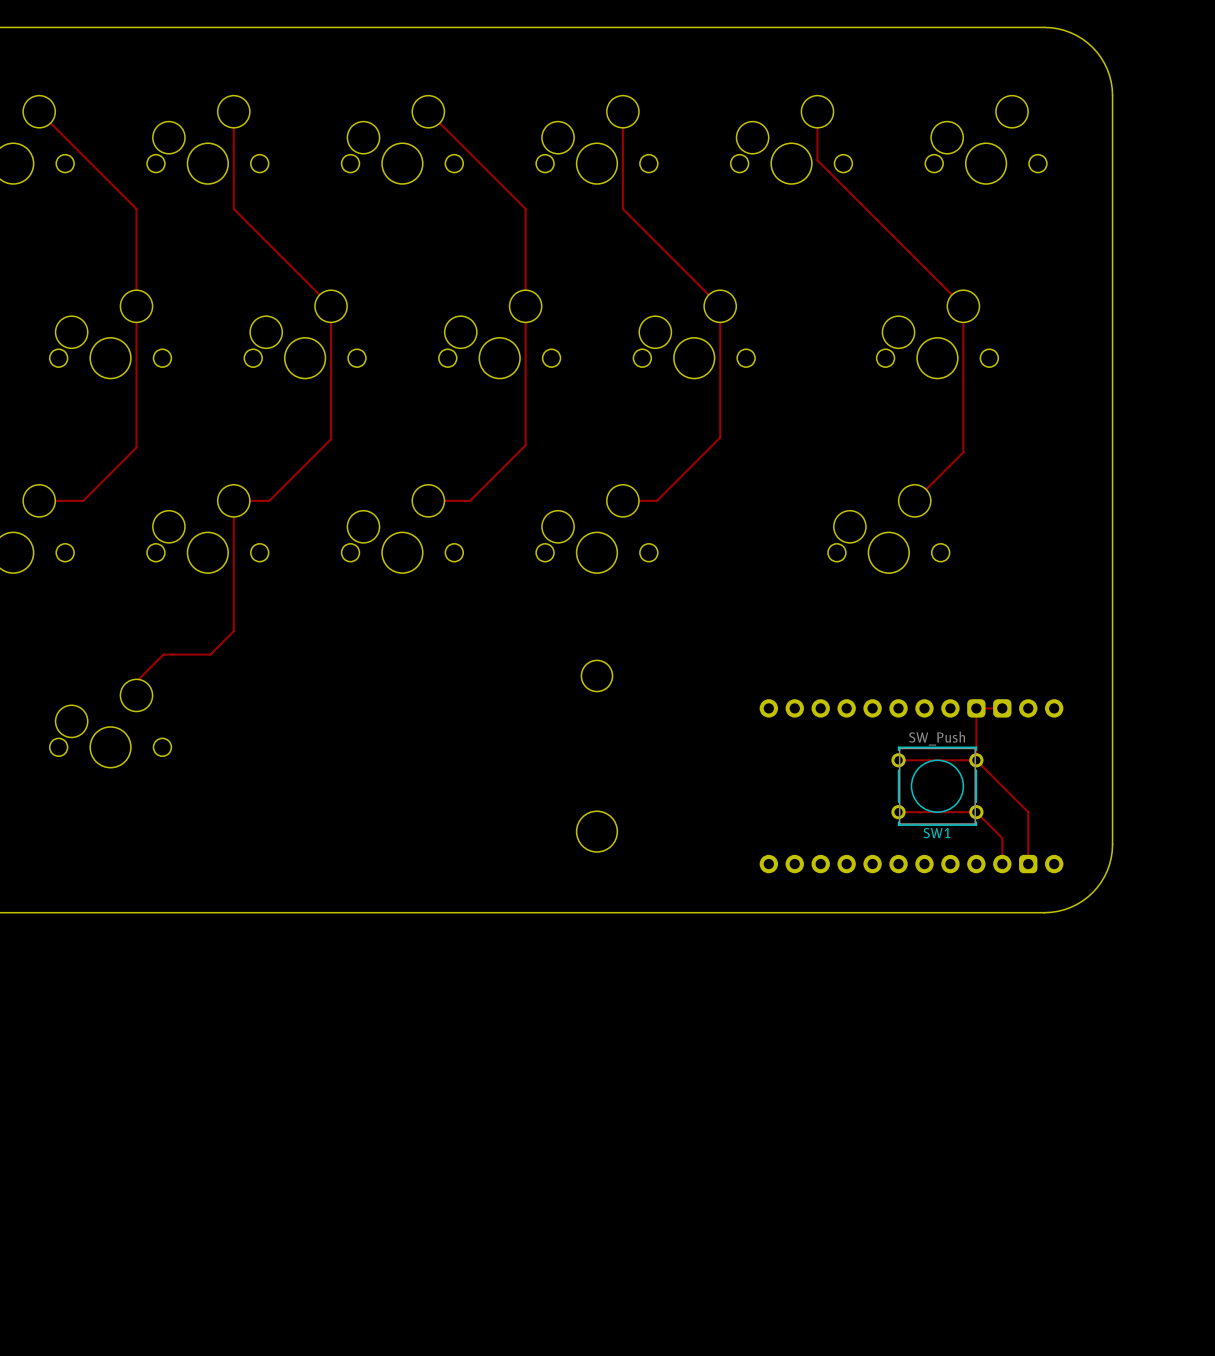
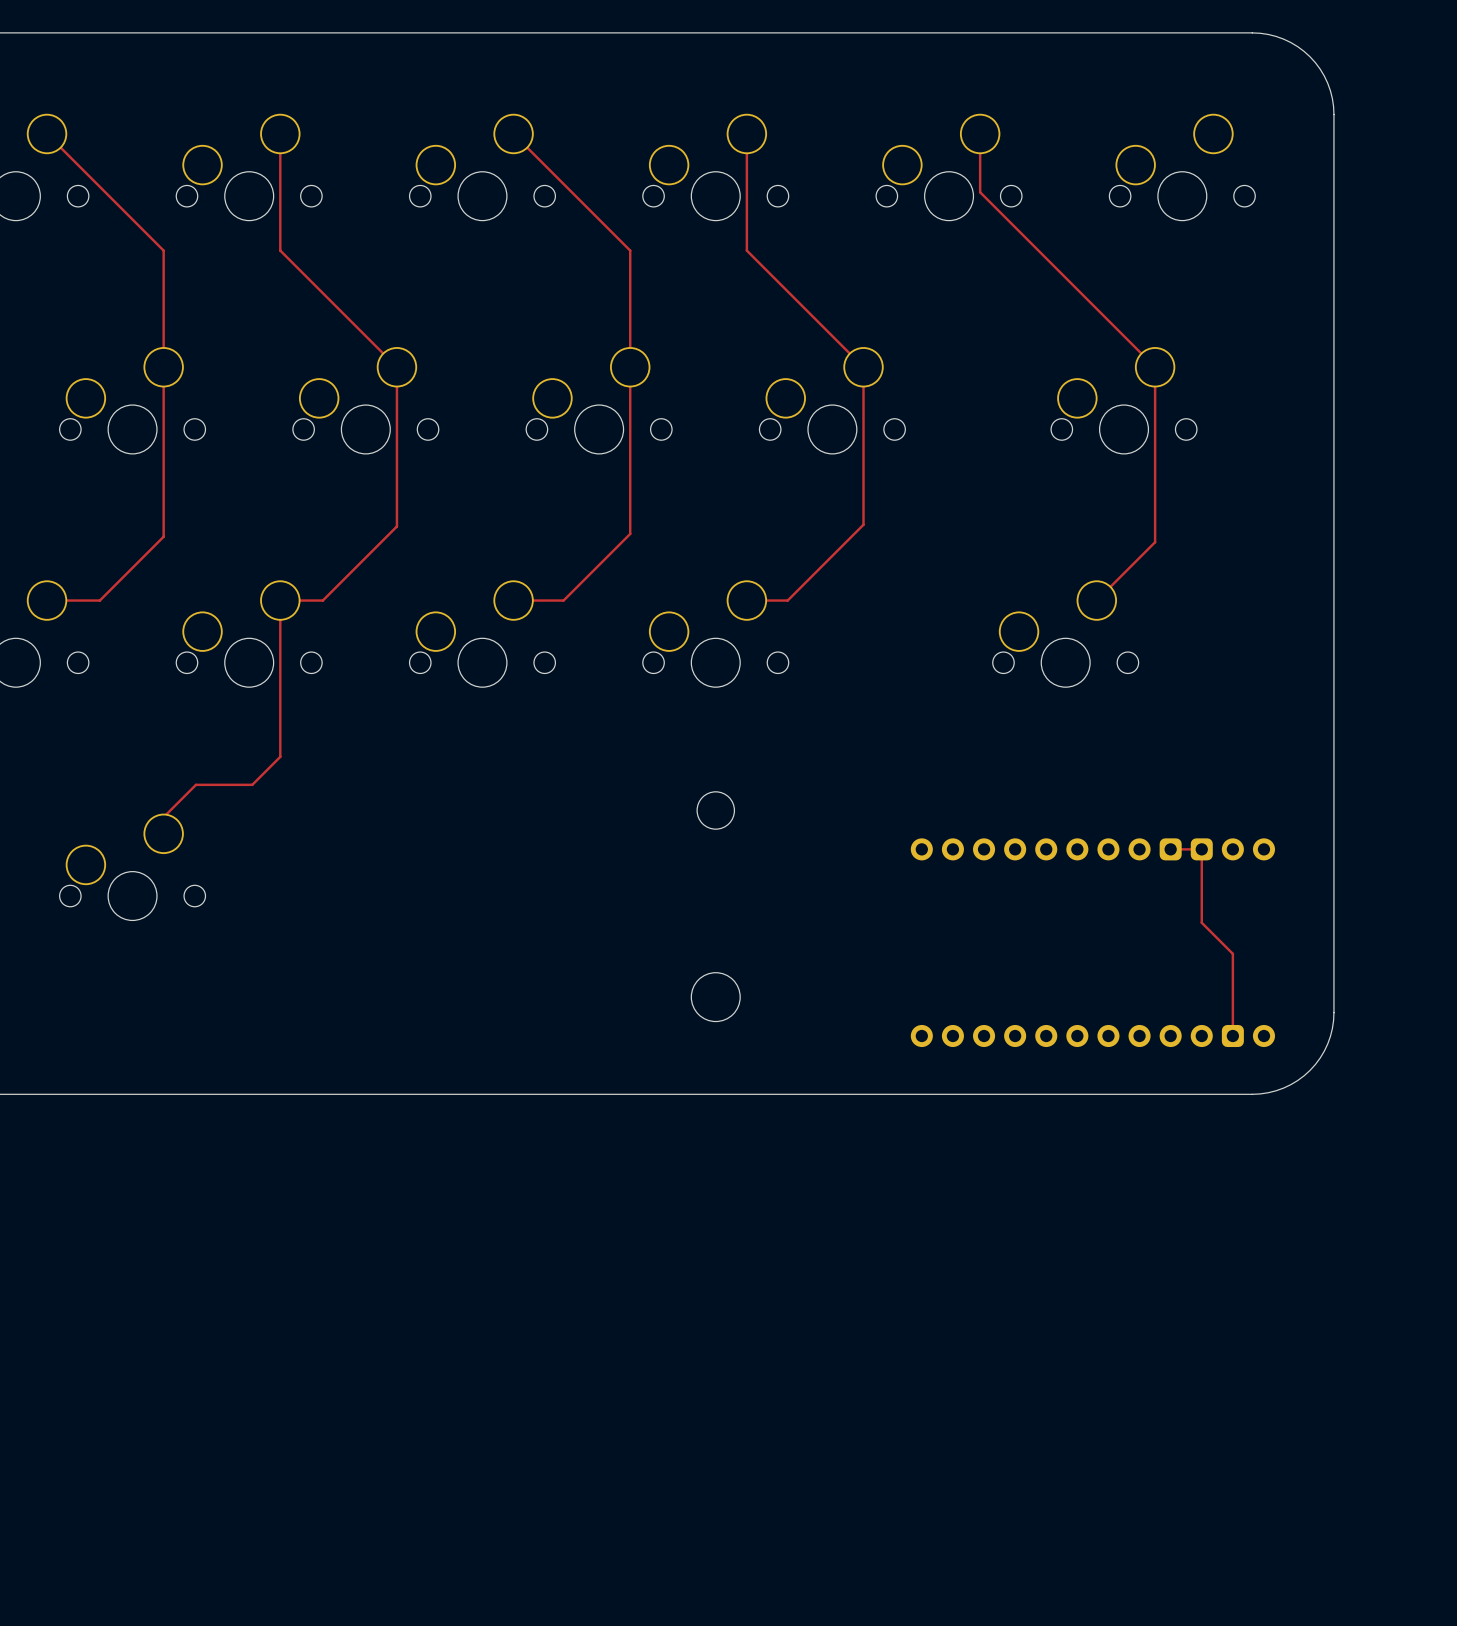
track: (976, 708) (976, 760) -> none
track: (898, 760) (976, 760) -> none
track: (976, 760) (1028, 812) -> (1201, 849) (1201, 922) (1232, 953) (1232, 973)
SW1: SW_Push (937, 786) -> none
track: (898, 812) (976, 812) (1002, 838) (1002, 864) -> none

